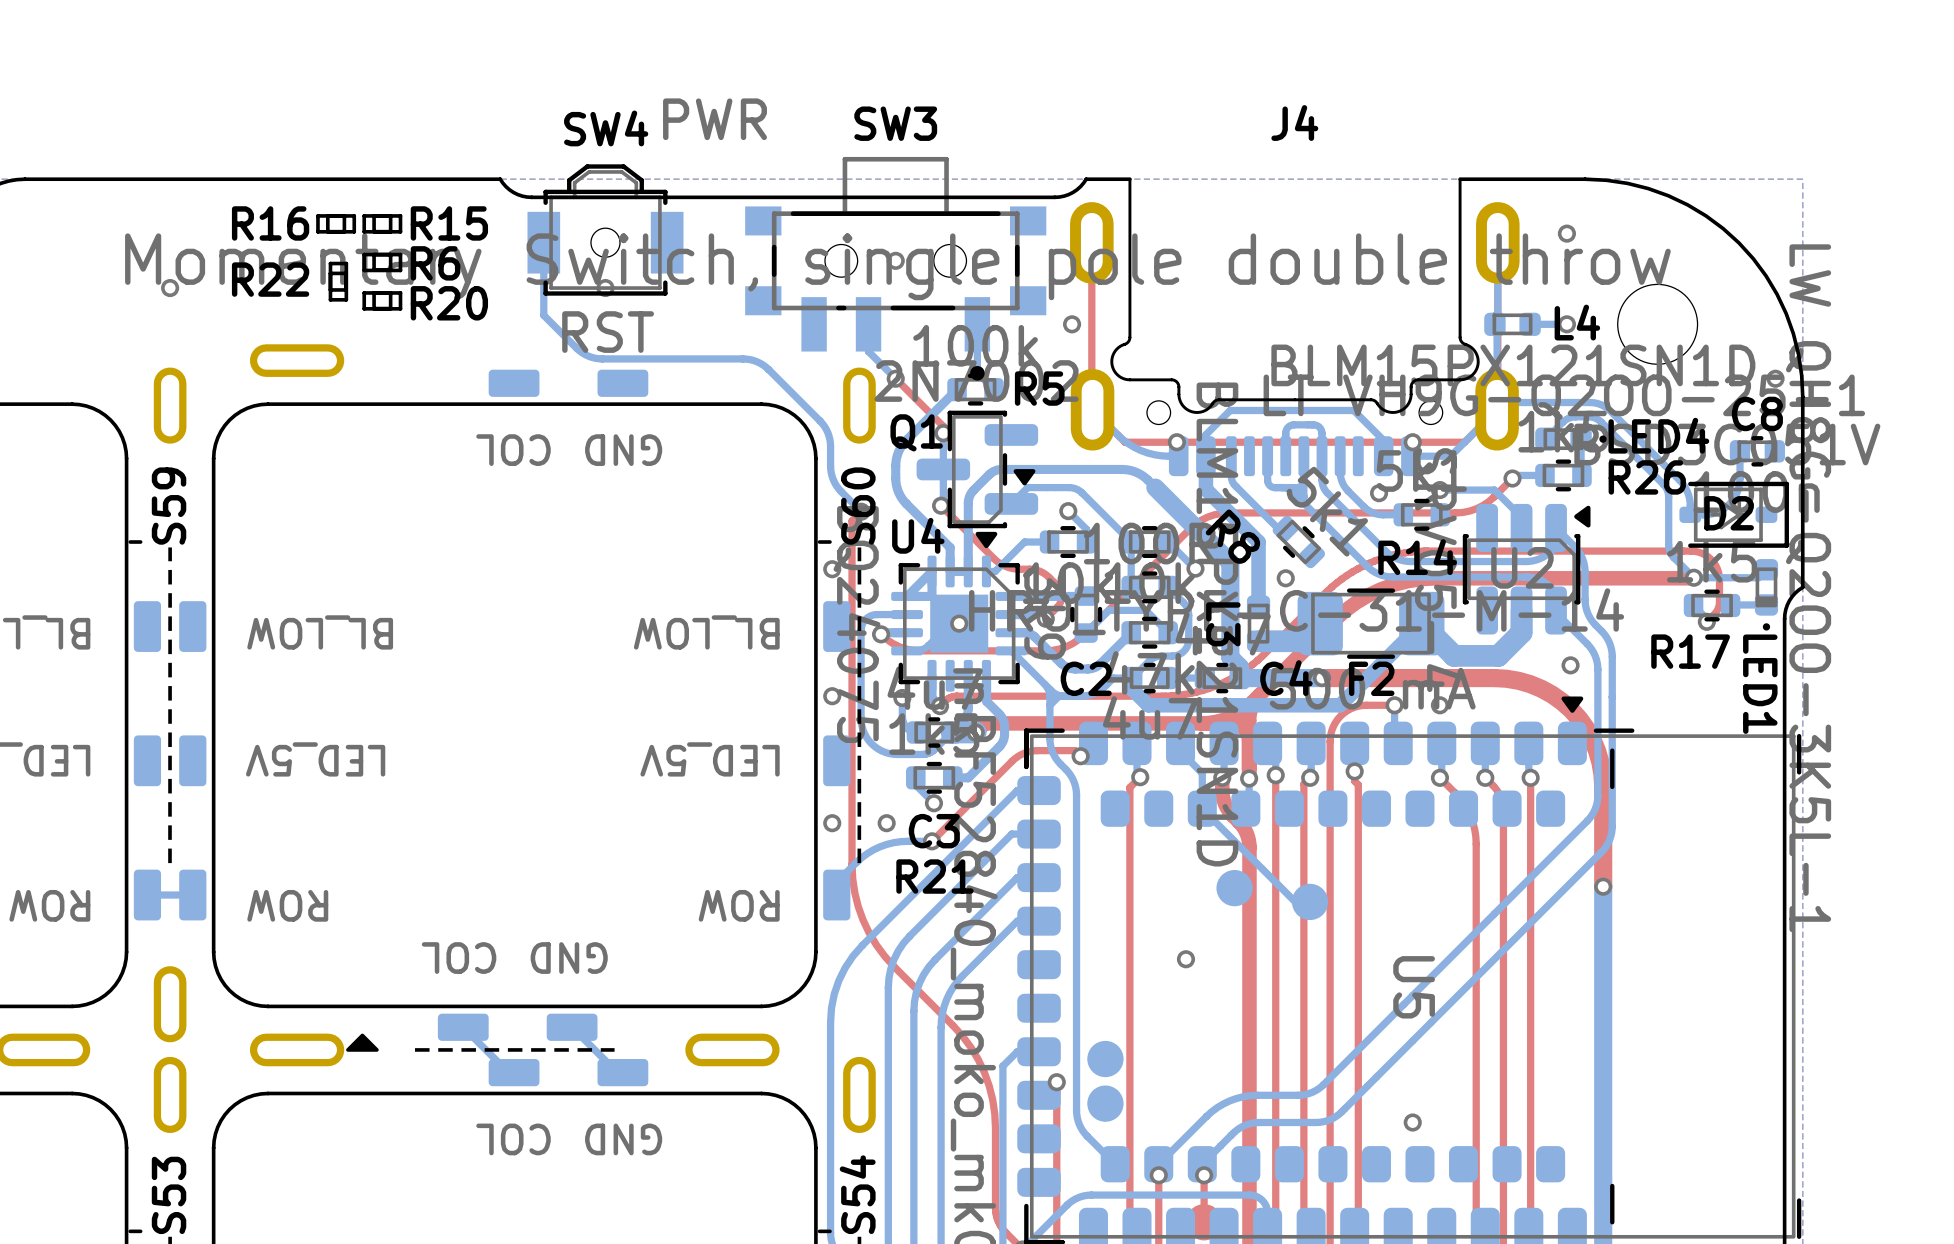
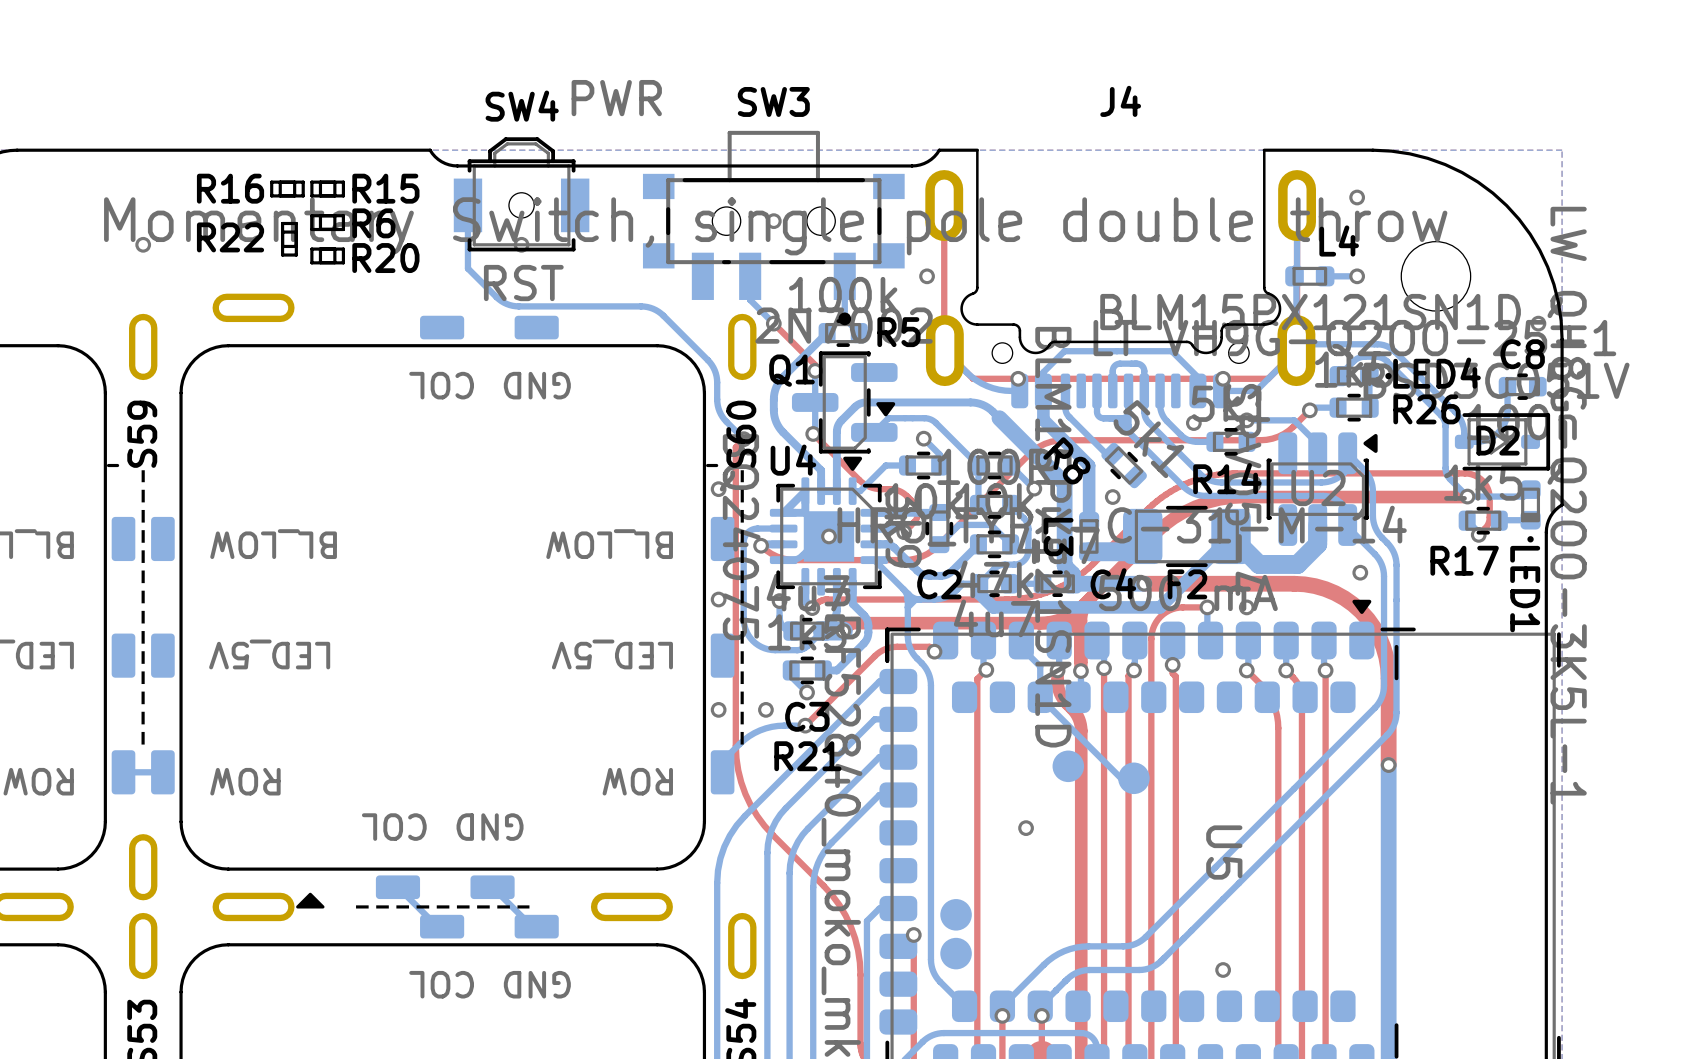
L4 name position: L4 (1577, 322) -> L4 (1339, 241)

